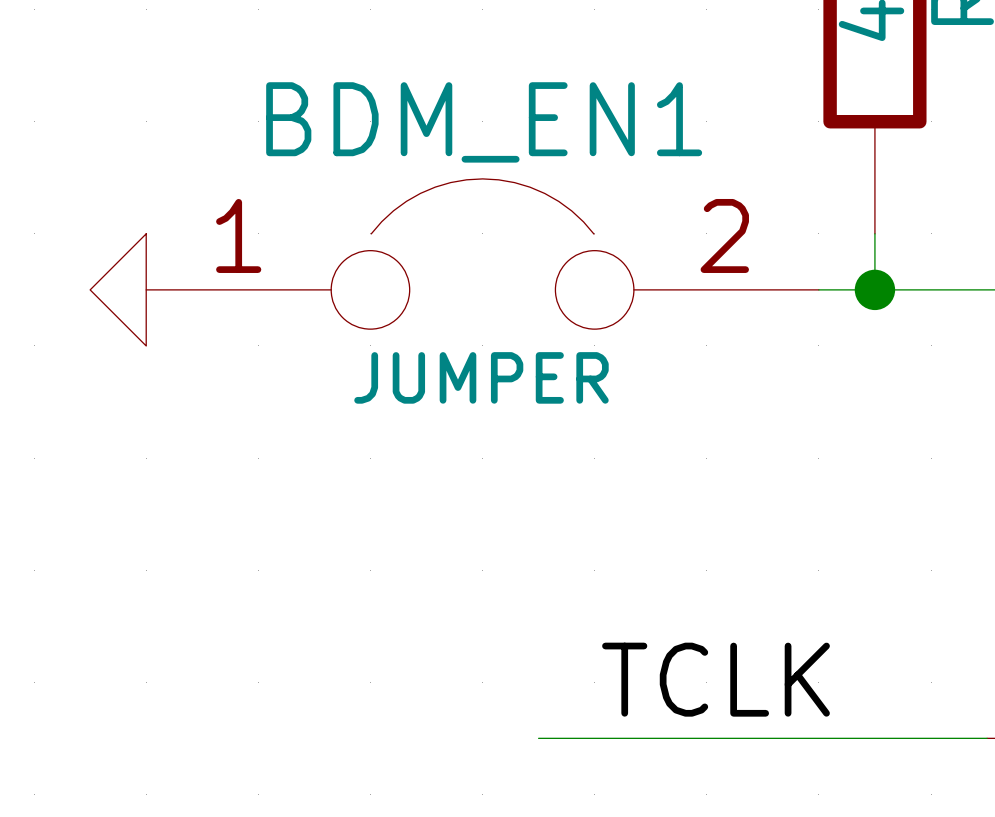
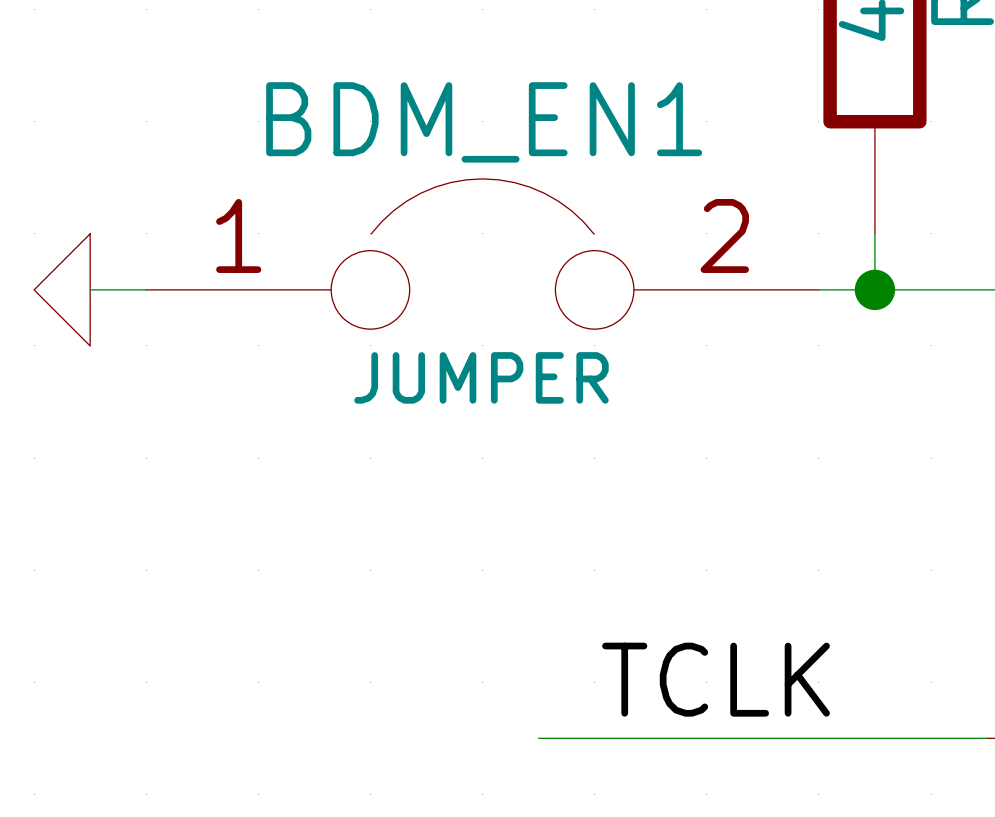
wire: none -> (90, 289) (146, 289)
power symbol position: (118, 289) -> (62, 289)

